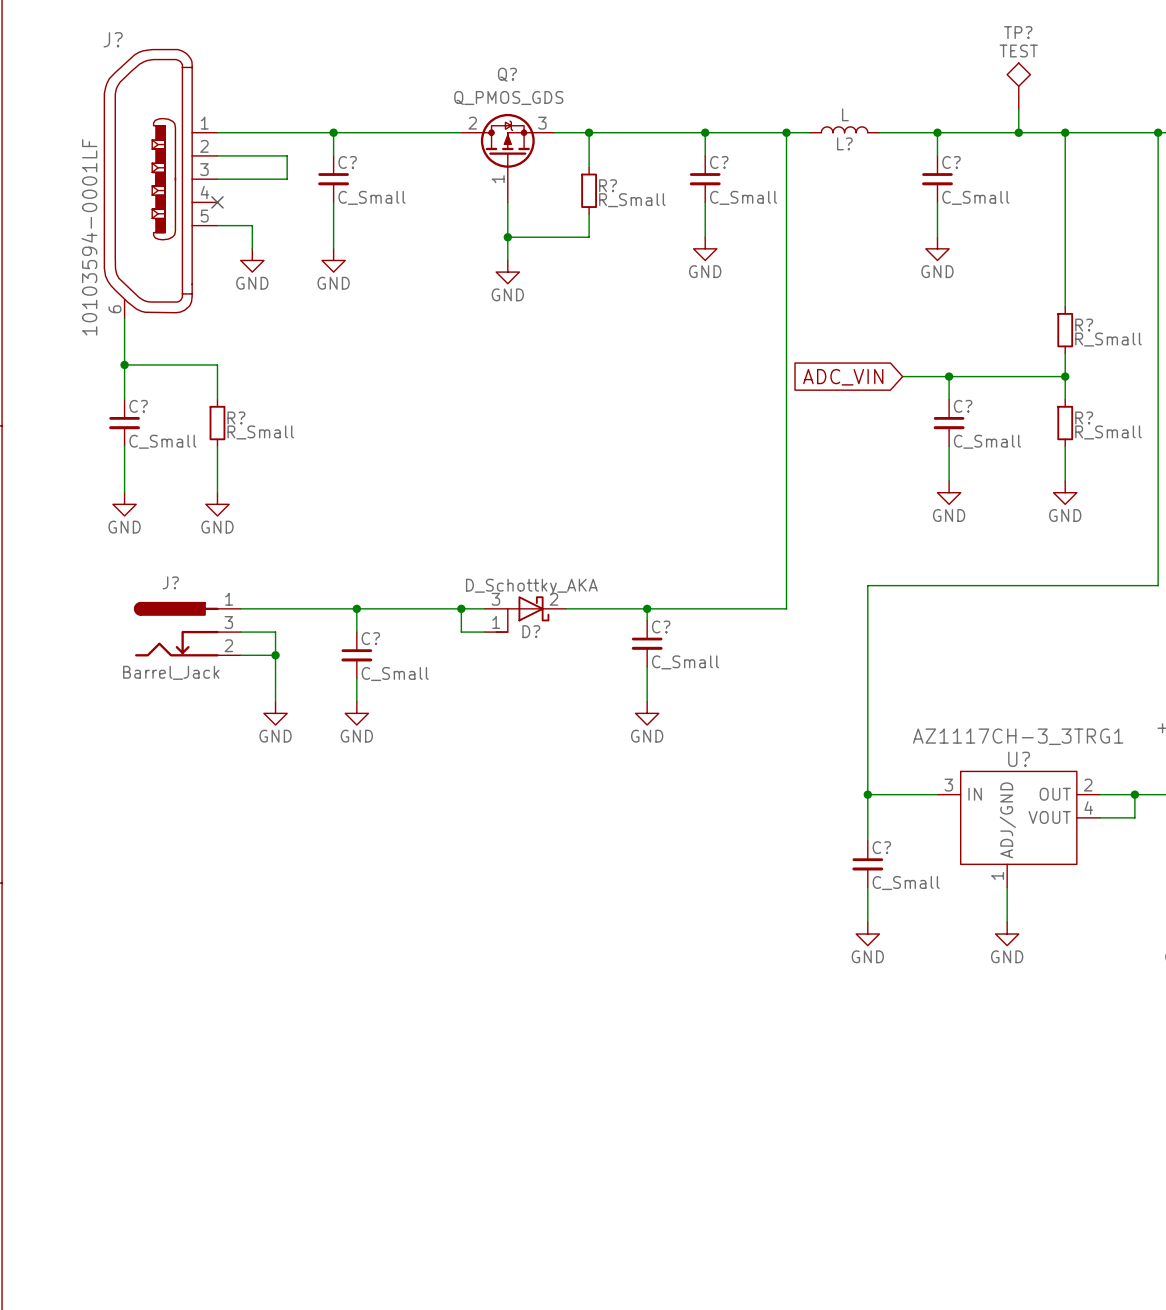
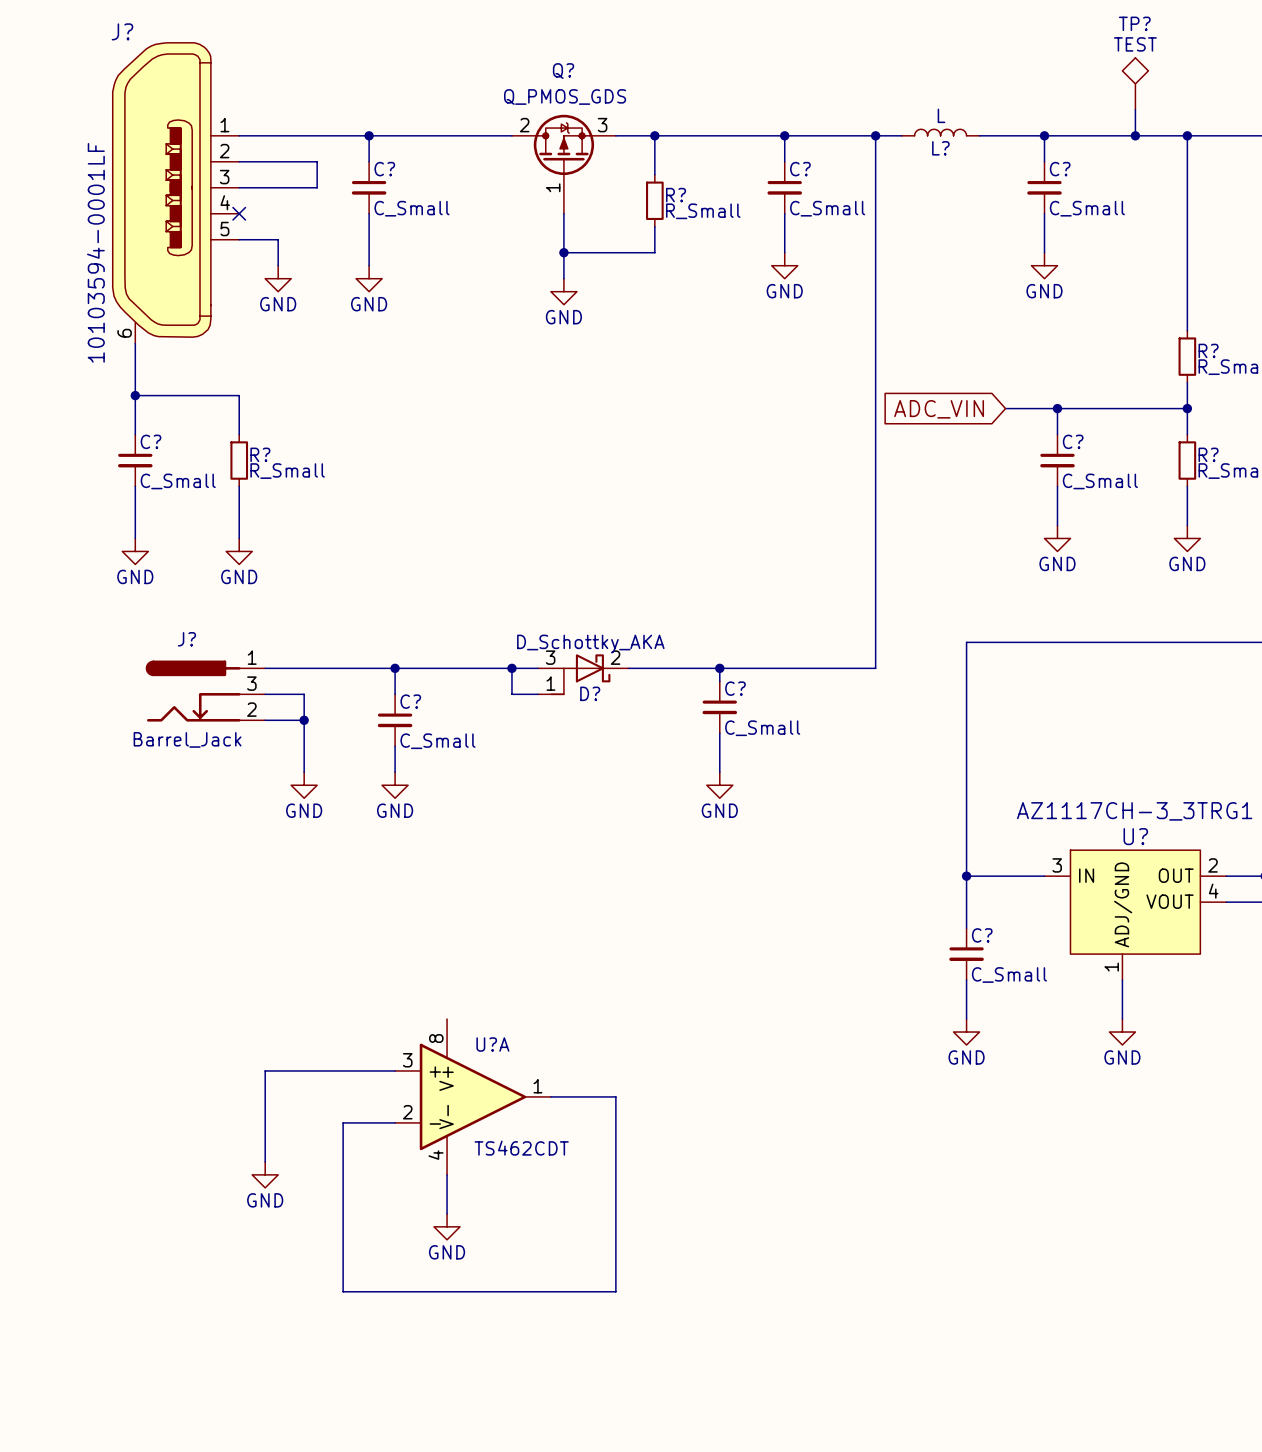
wire: none -> (395, 1070) (265, 1070) (265, 1161)
U?A: none -> TS462CDT (473, 1096)
wire: none -> (550, 1096) (615, 1096) (615, 1291) (343, 1291) (343, 1122) (395, 1122)
power symbol: none -> GND (265, 1174)
wire: none -> (447, 1174) (447, 1213)
power symbol: none -> GND (447, 1226)

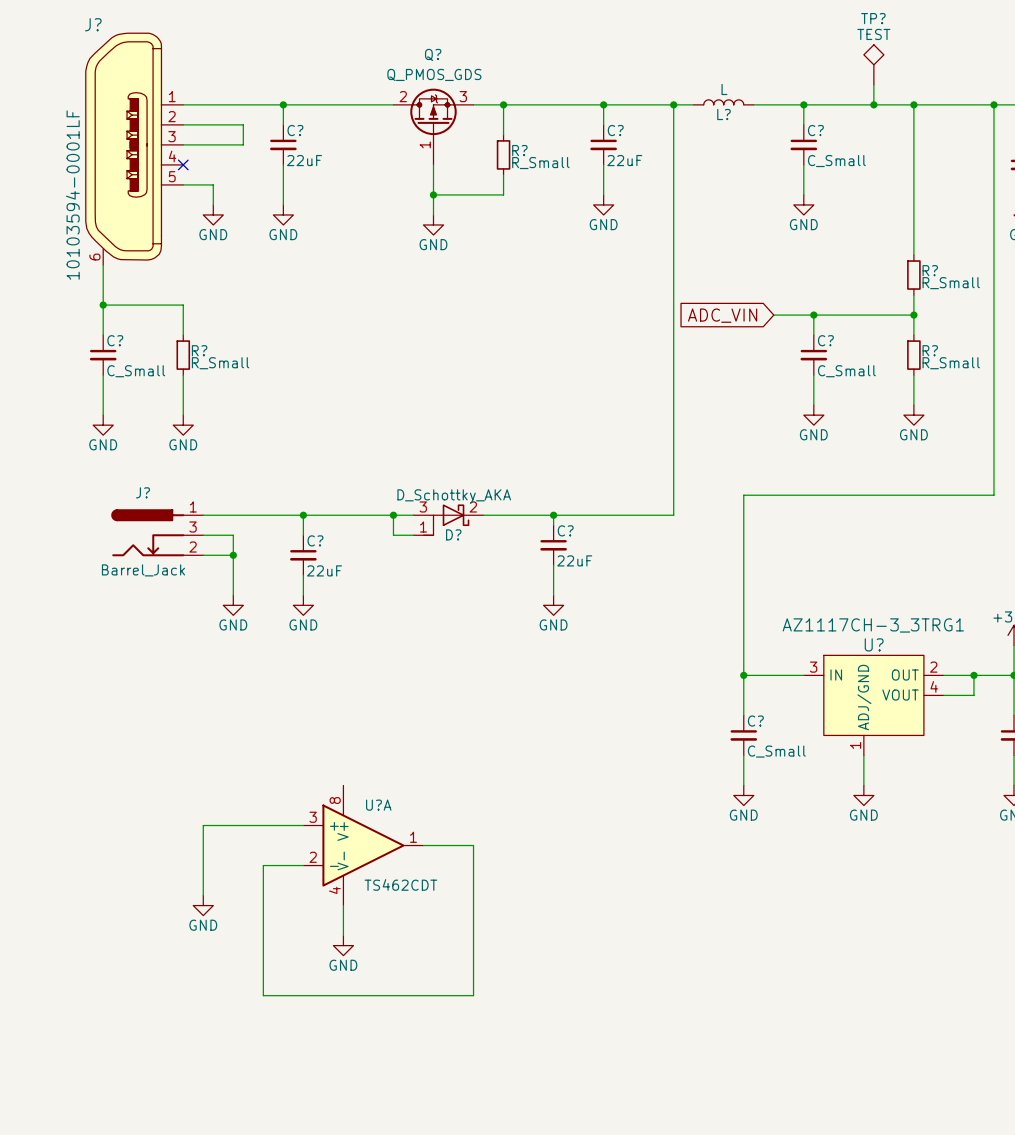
C? value: C_Small (412, 208) -> 22uF (304, 160)
C? value: C_Small (827, 208) -> 22uF (624, 160)
C? value: C_Small (762, 728) -> 22uF (574, 560)
C? value: C_Small (437, 741) -> 22uF (324, 570)

